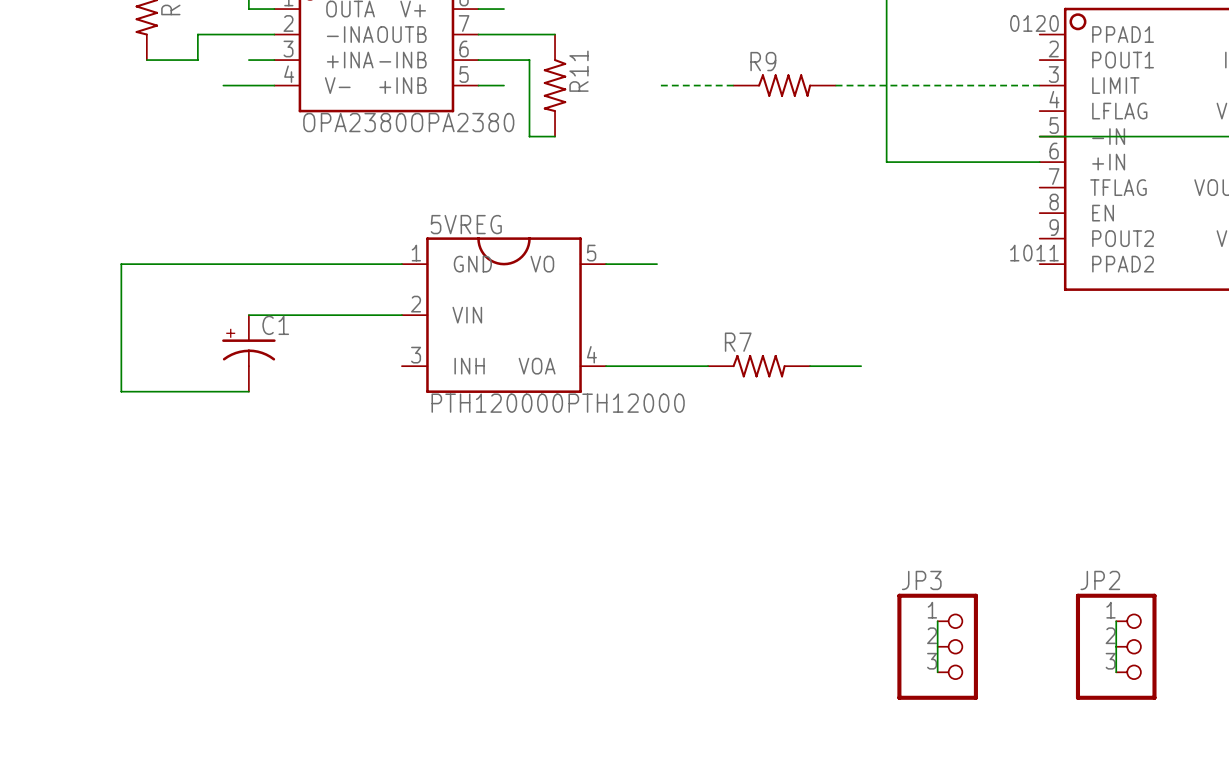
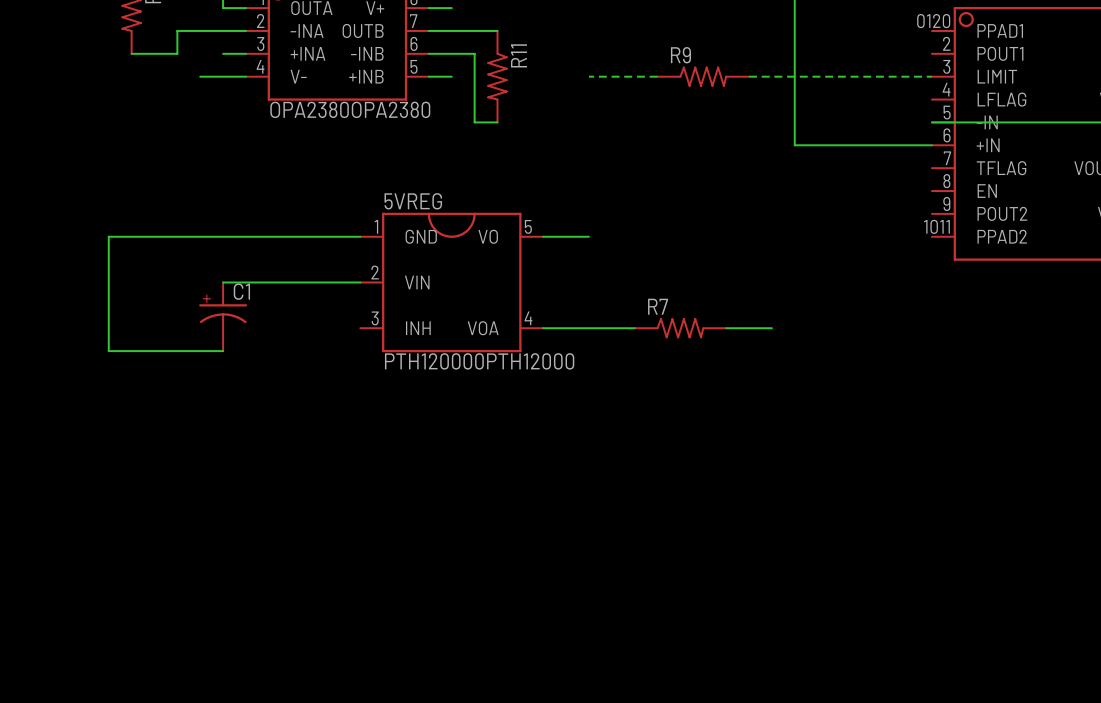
wire: (937, 621) (937, 672) -> none
wire: (1116, 621) (1116, 672) -> none
JP3: (937, 646) -> none
JP2: (1116, 646) -> none

